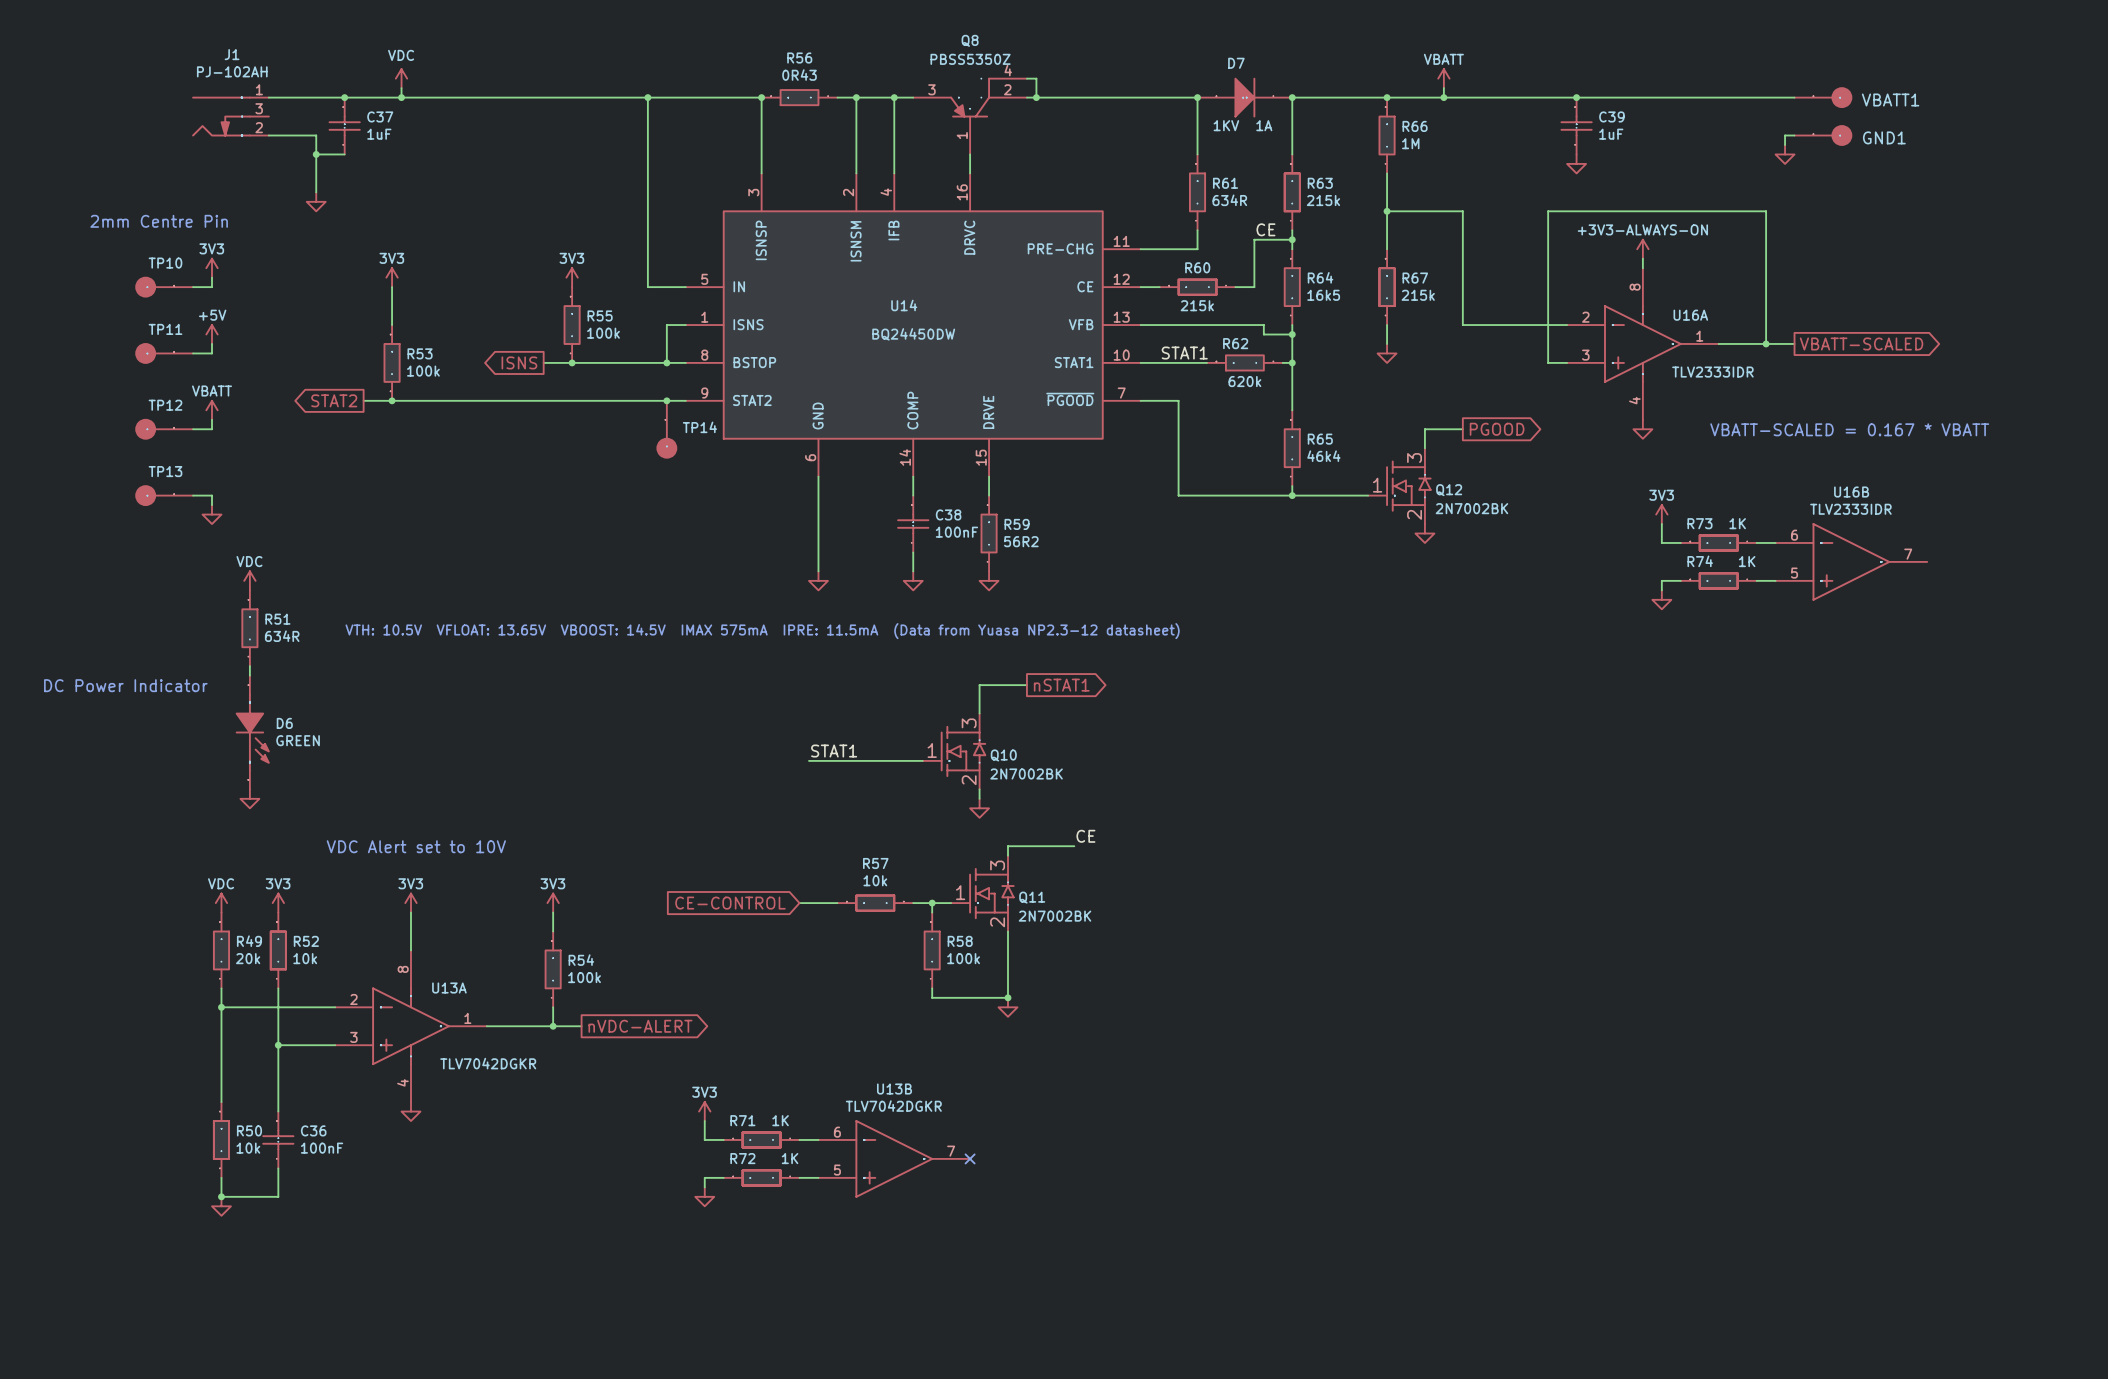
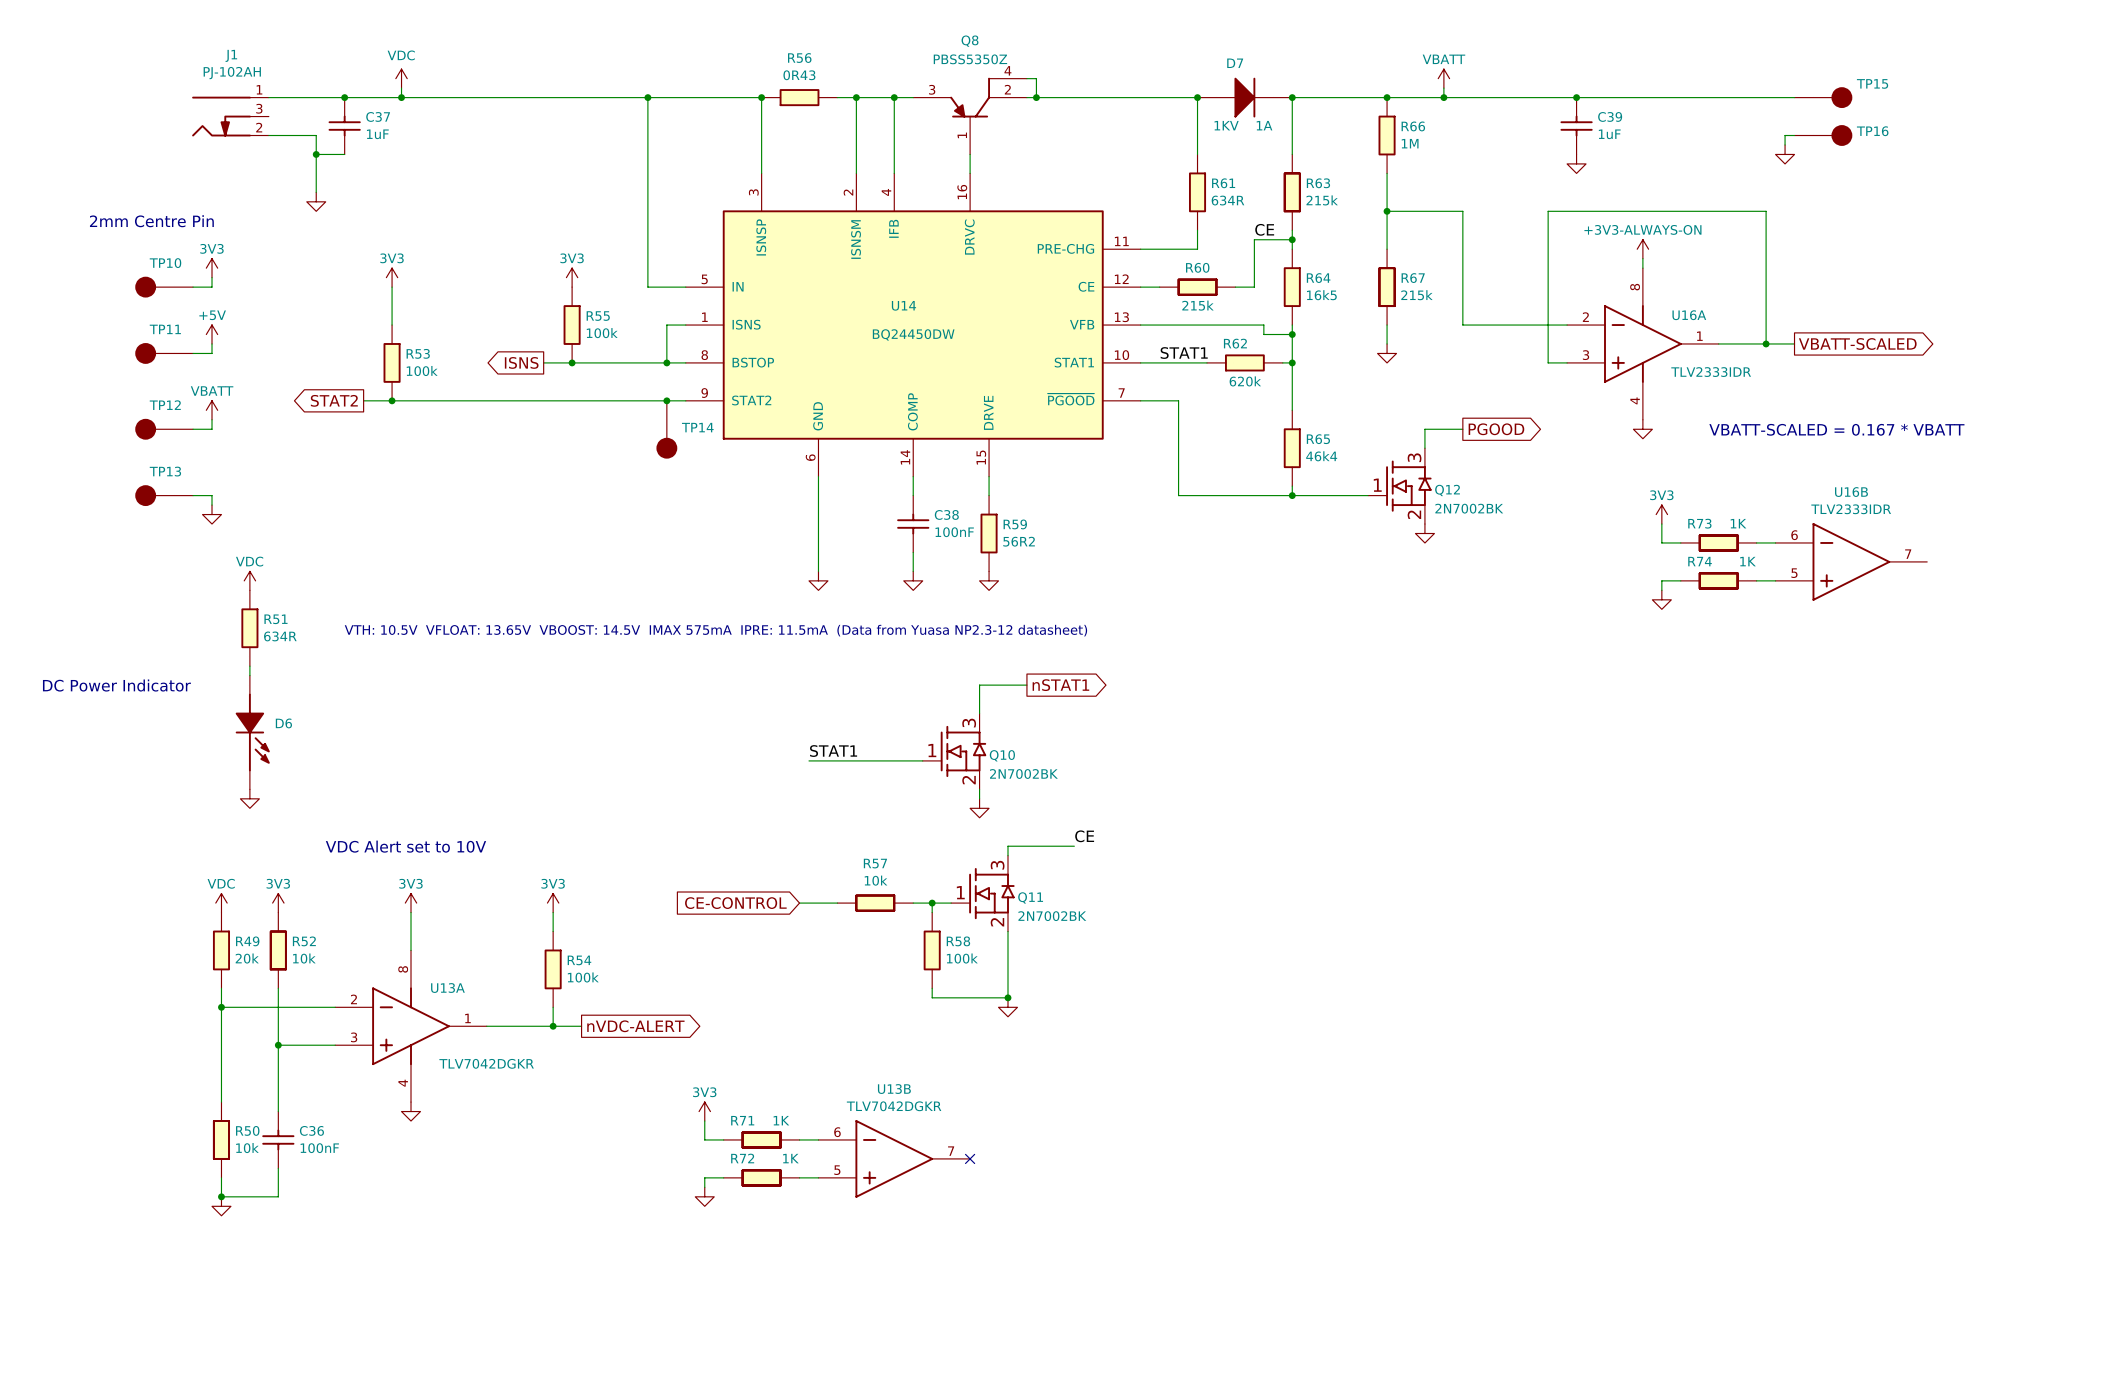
VBATT1 name: VBATT1 (1890, 100) -> TP15 (1872, 83)
GND1 name: GND1 (1884, 137) -> TP16 (1872, 131)
D6 text: GREEN (298, 740) -> none

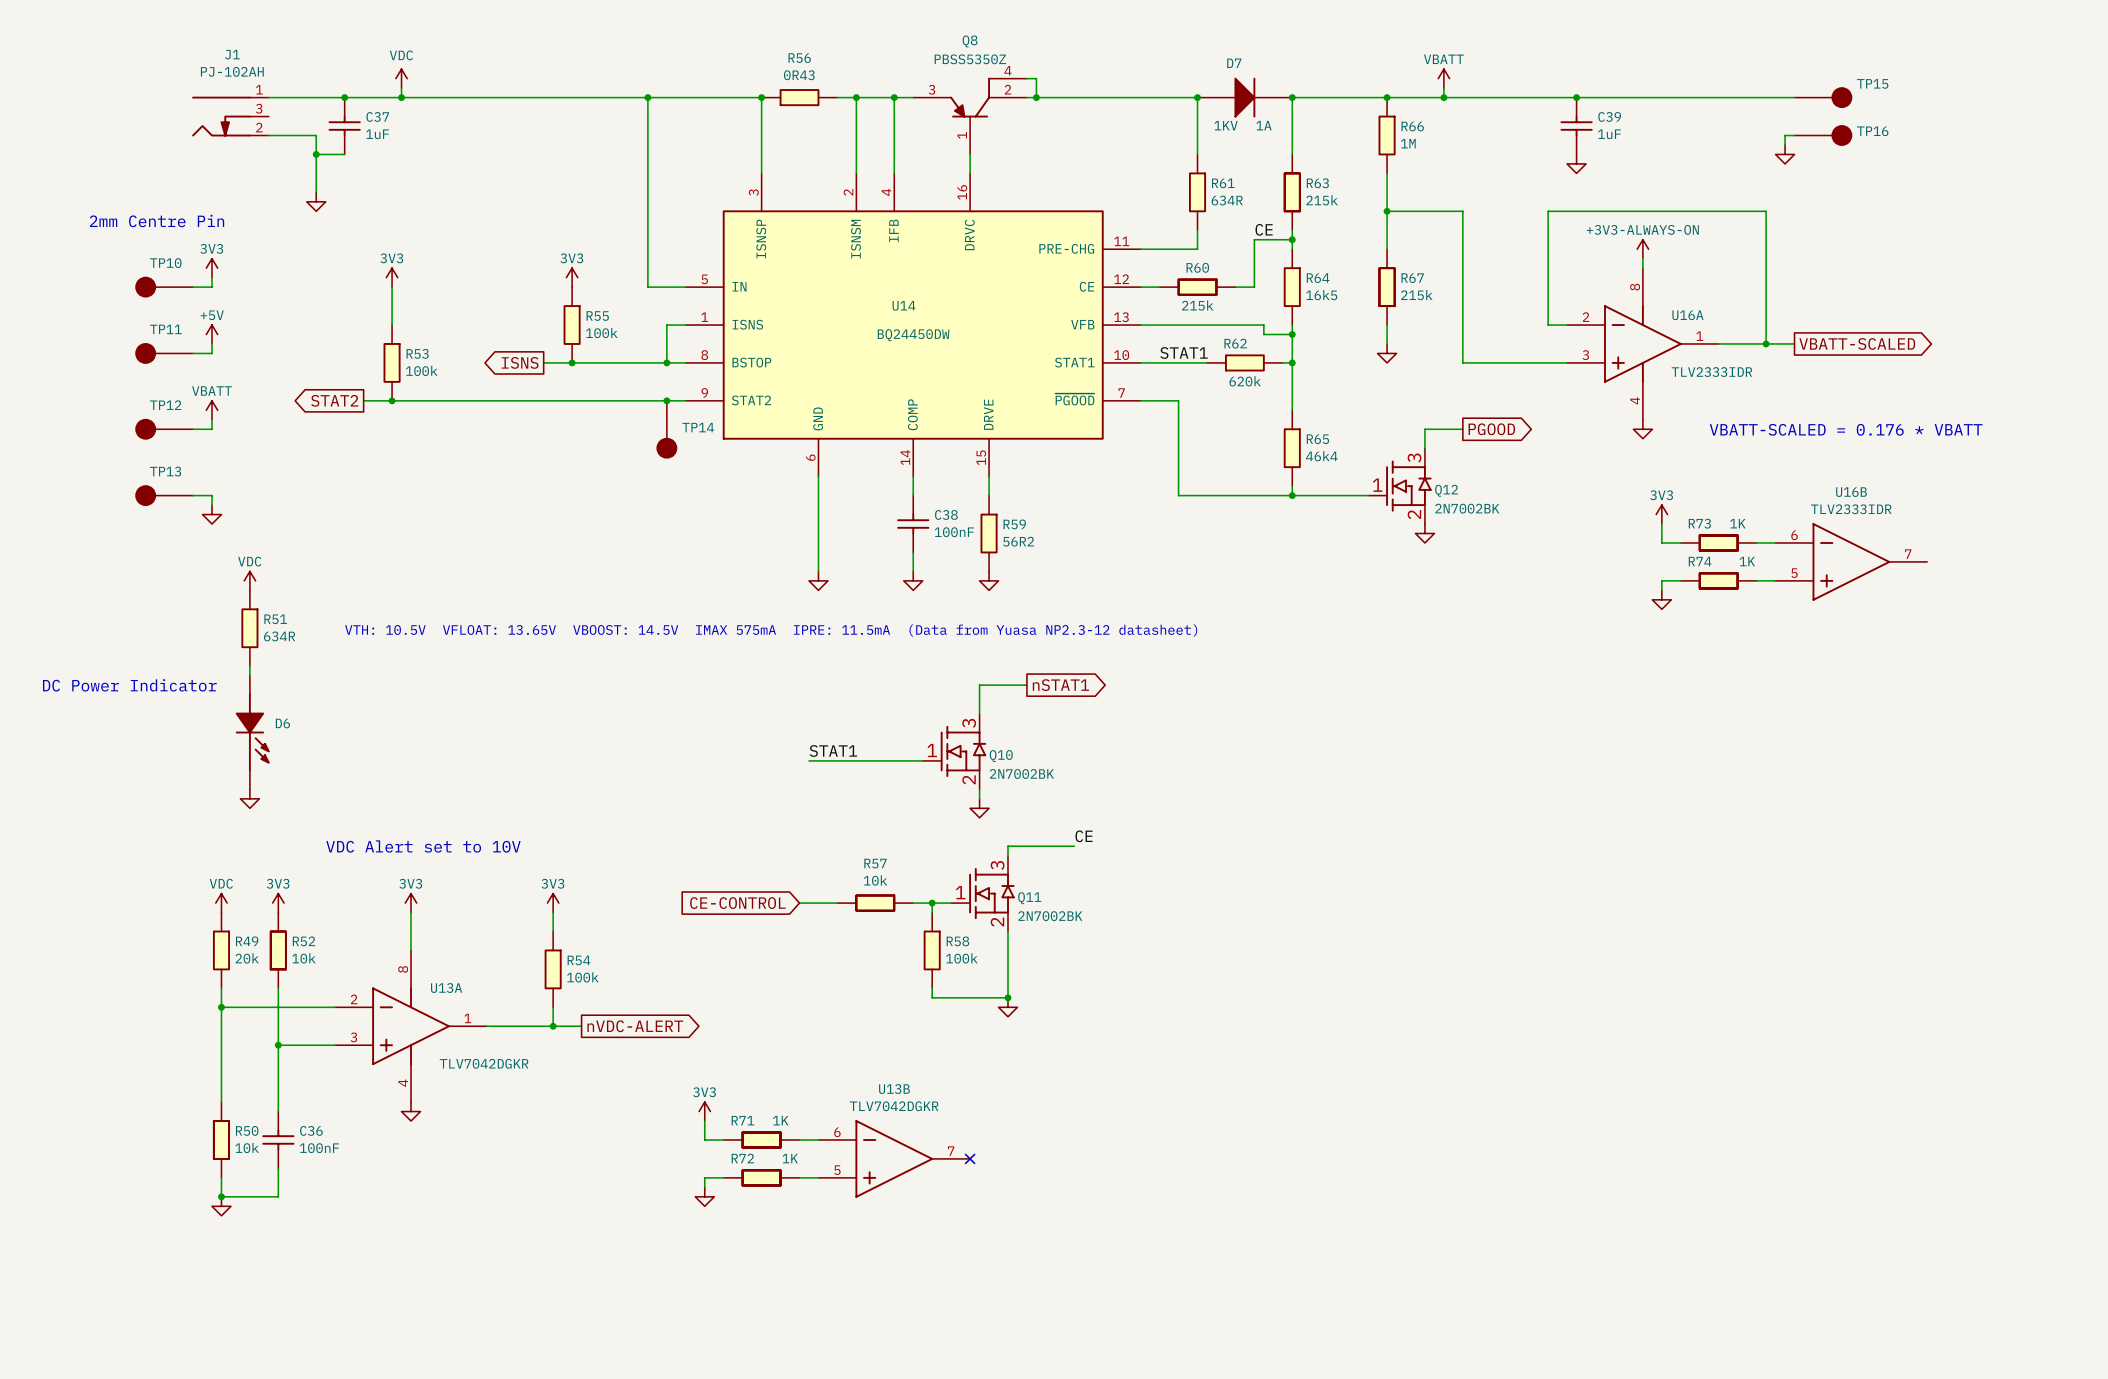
wire: (1462, 325) (1548, 325) (1548, 362) -> (1462, 325) (1462, 362) (1548, 362)
text: VBATT-SCALED = 0.167 * VBATT (1836, 429) -> VBATT-SCALED = 0.176 * VBATT (1846, 429)

